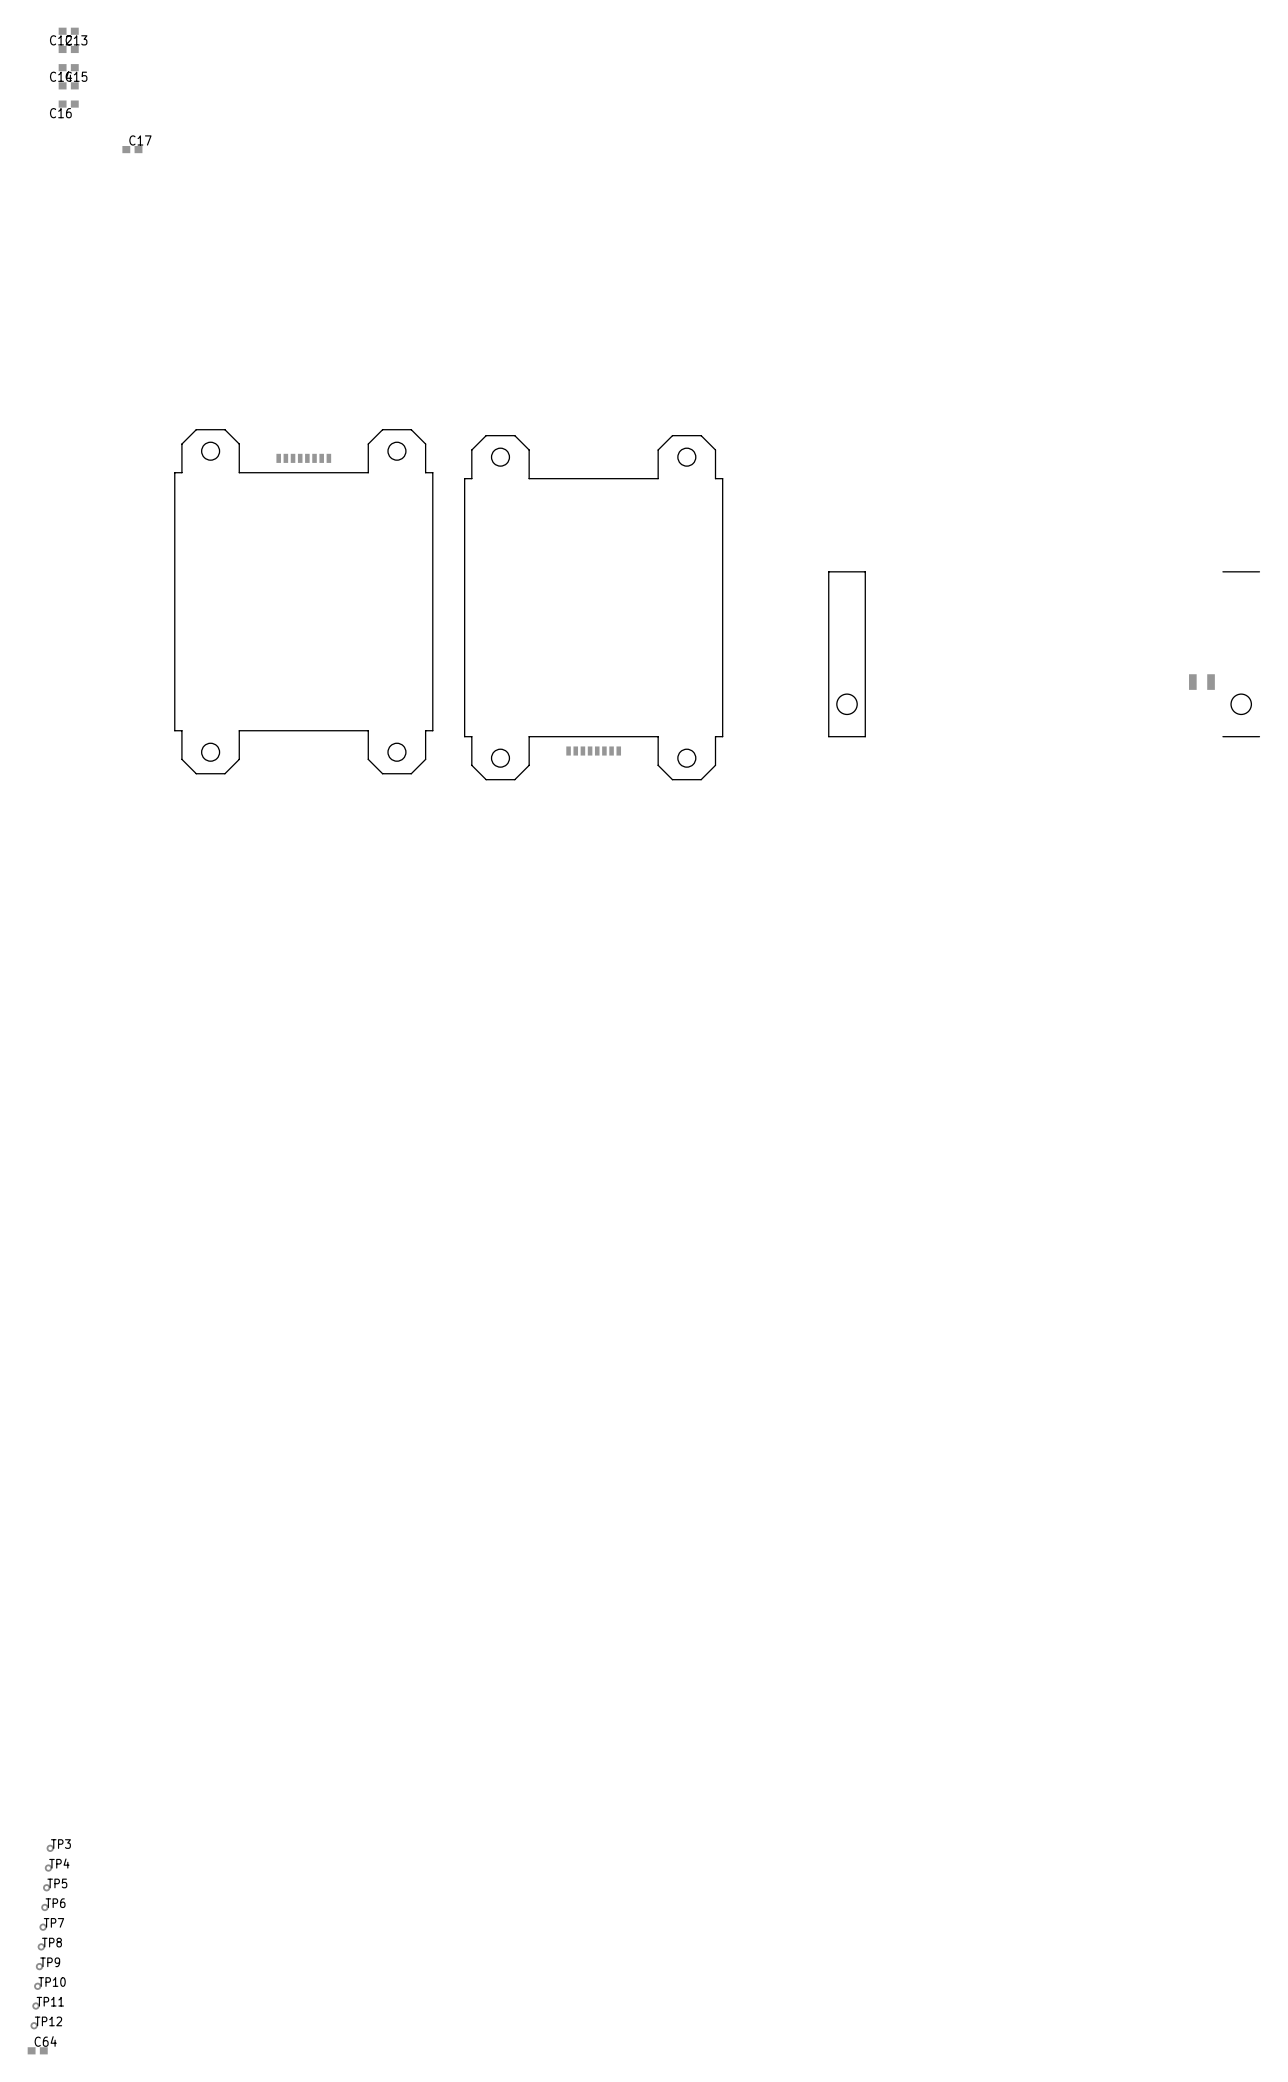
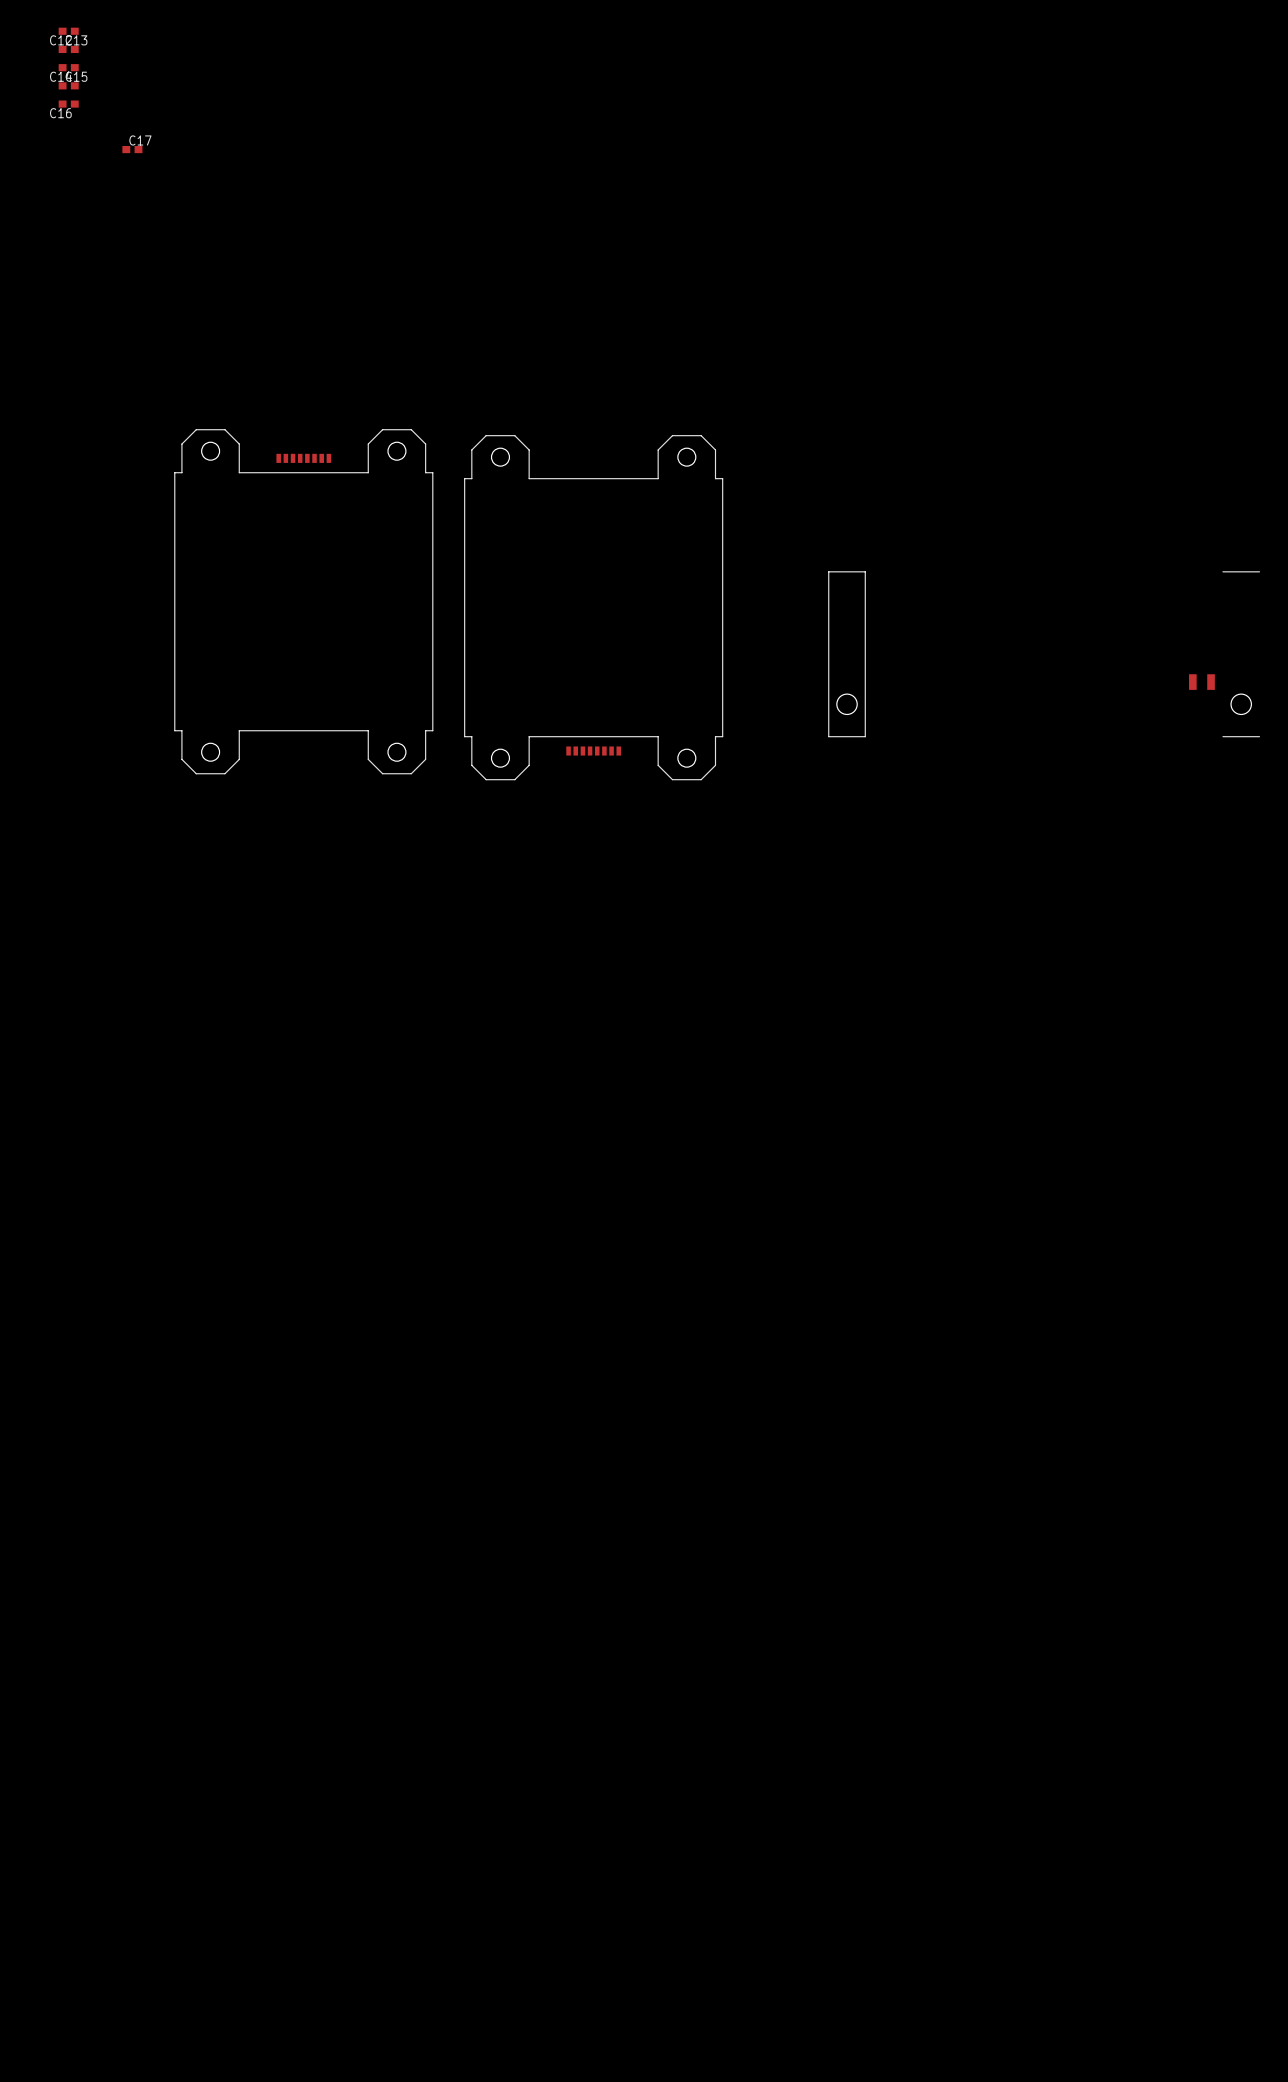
TP3: (50, 1848) -> none
TP4: (48, 1868) -> none
TP5: (46, 1887) -> none
TP6: (44, 1907) -> none
TP7: (43, 1927) -> none
TP8: (41, 1946) -> none
TP9: (39, 1966) -> none
TP10: (37, 1986) -> none
TP11: (35, 2006) -> none
TP12: (34, 2025) -> none
C64: (37, 2050) -> none

